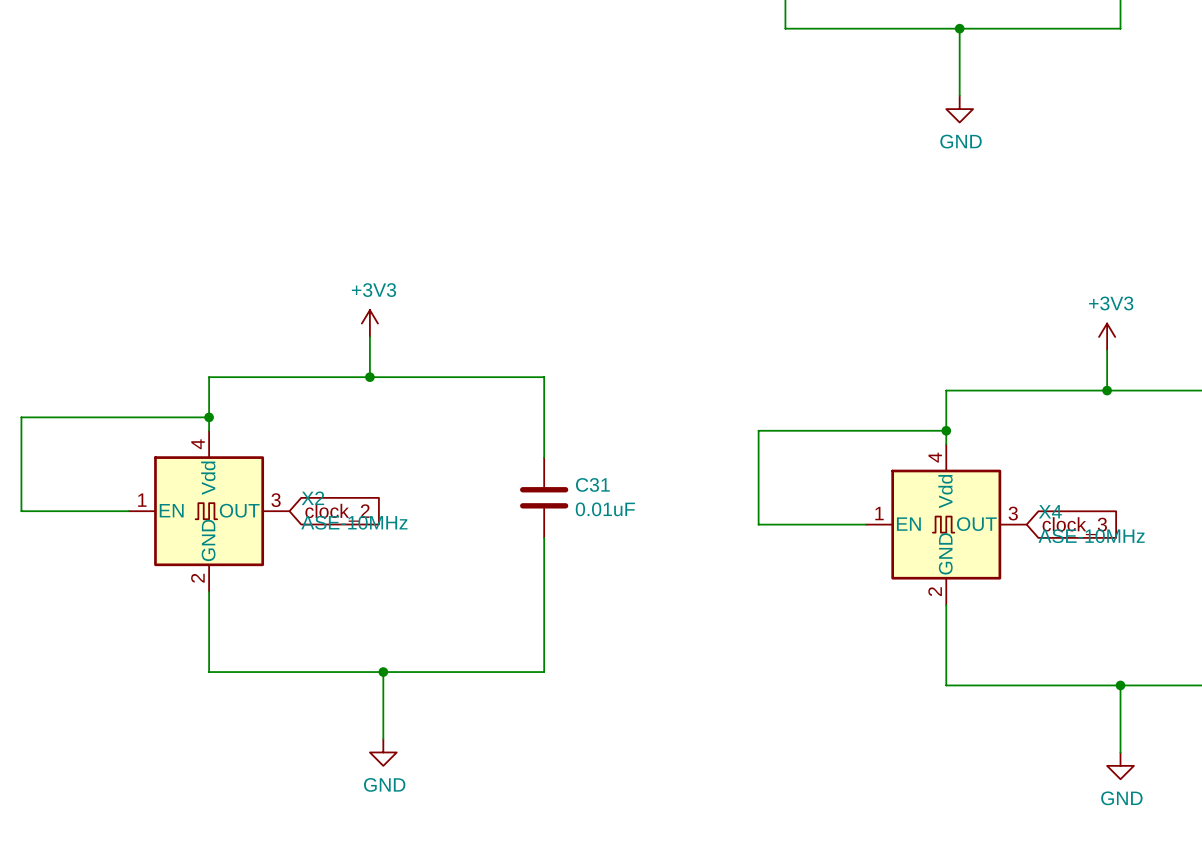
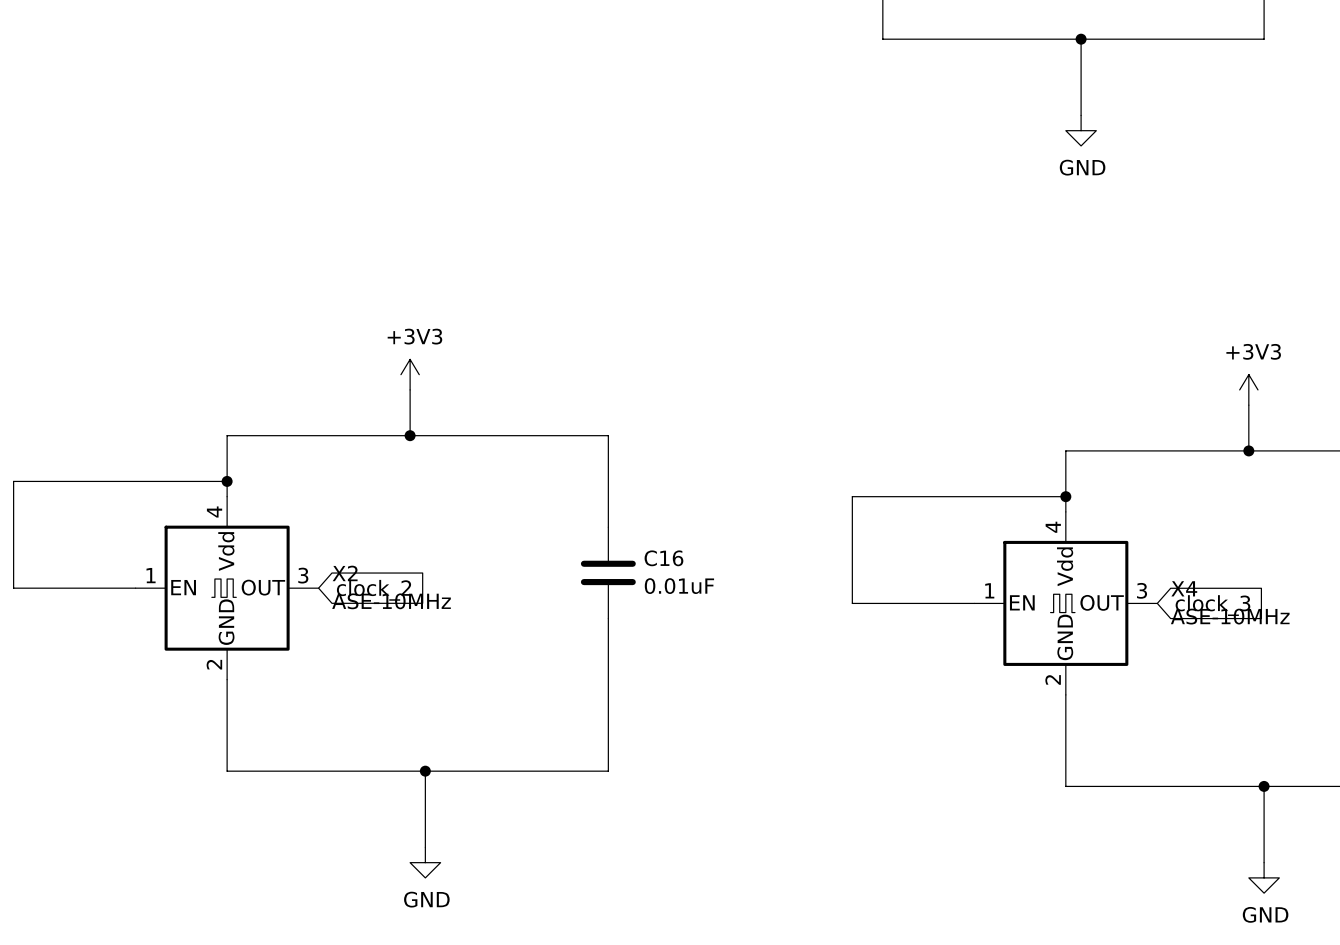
C31 name: C31 (592, 484) -> C16 (663, 558)

